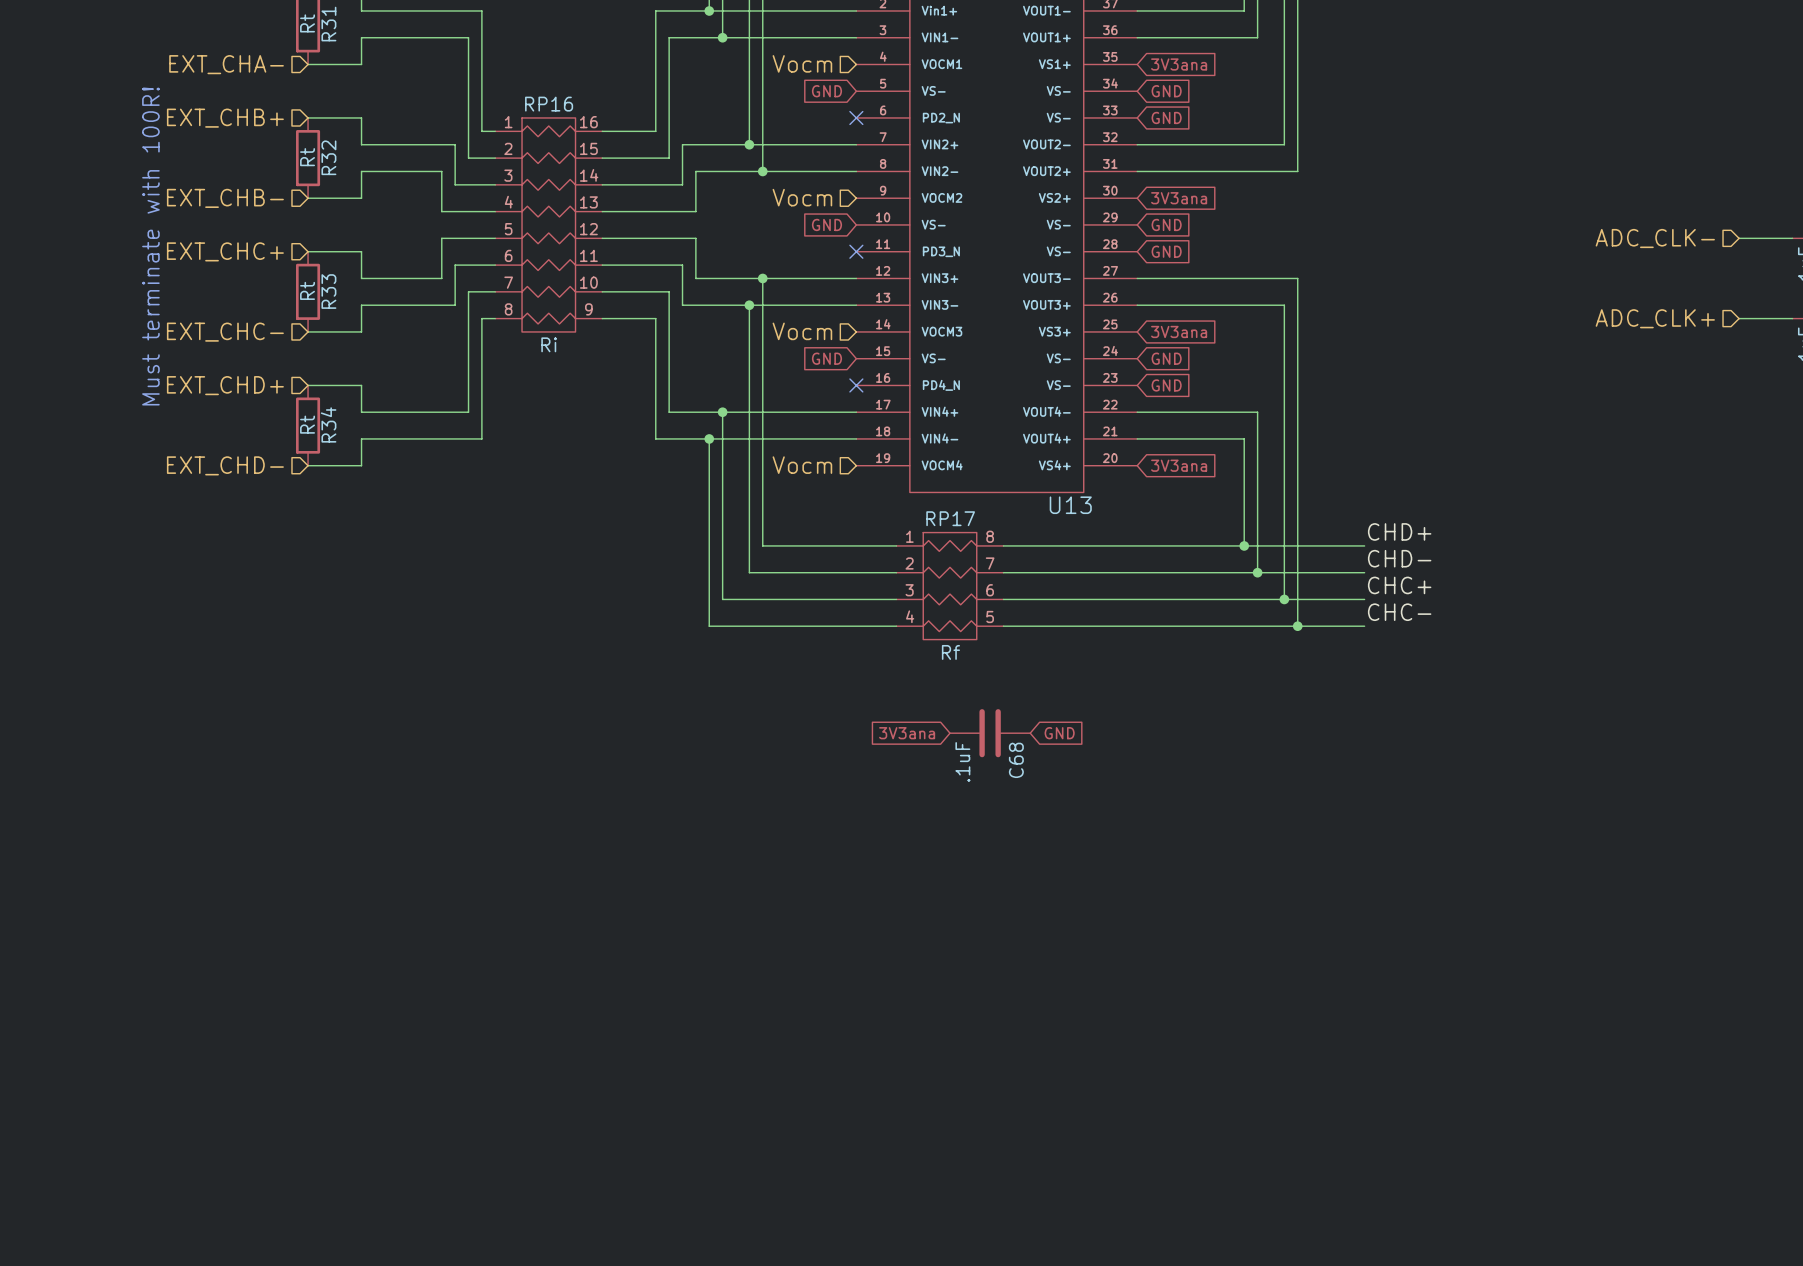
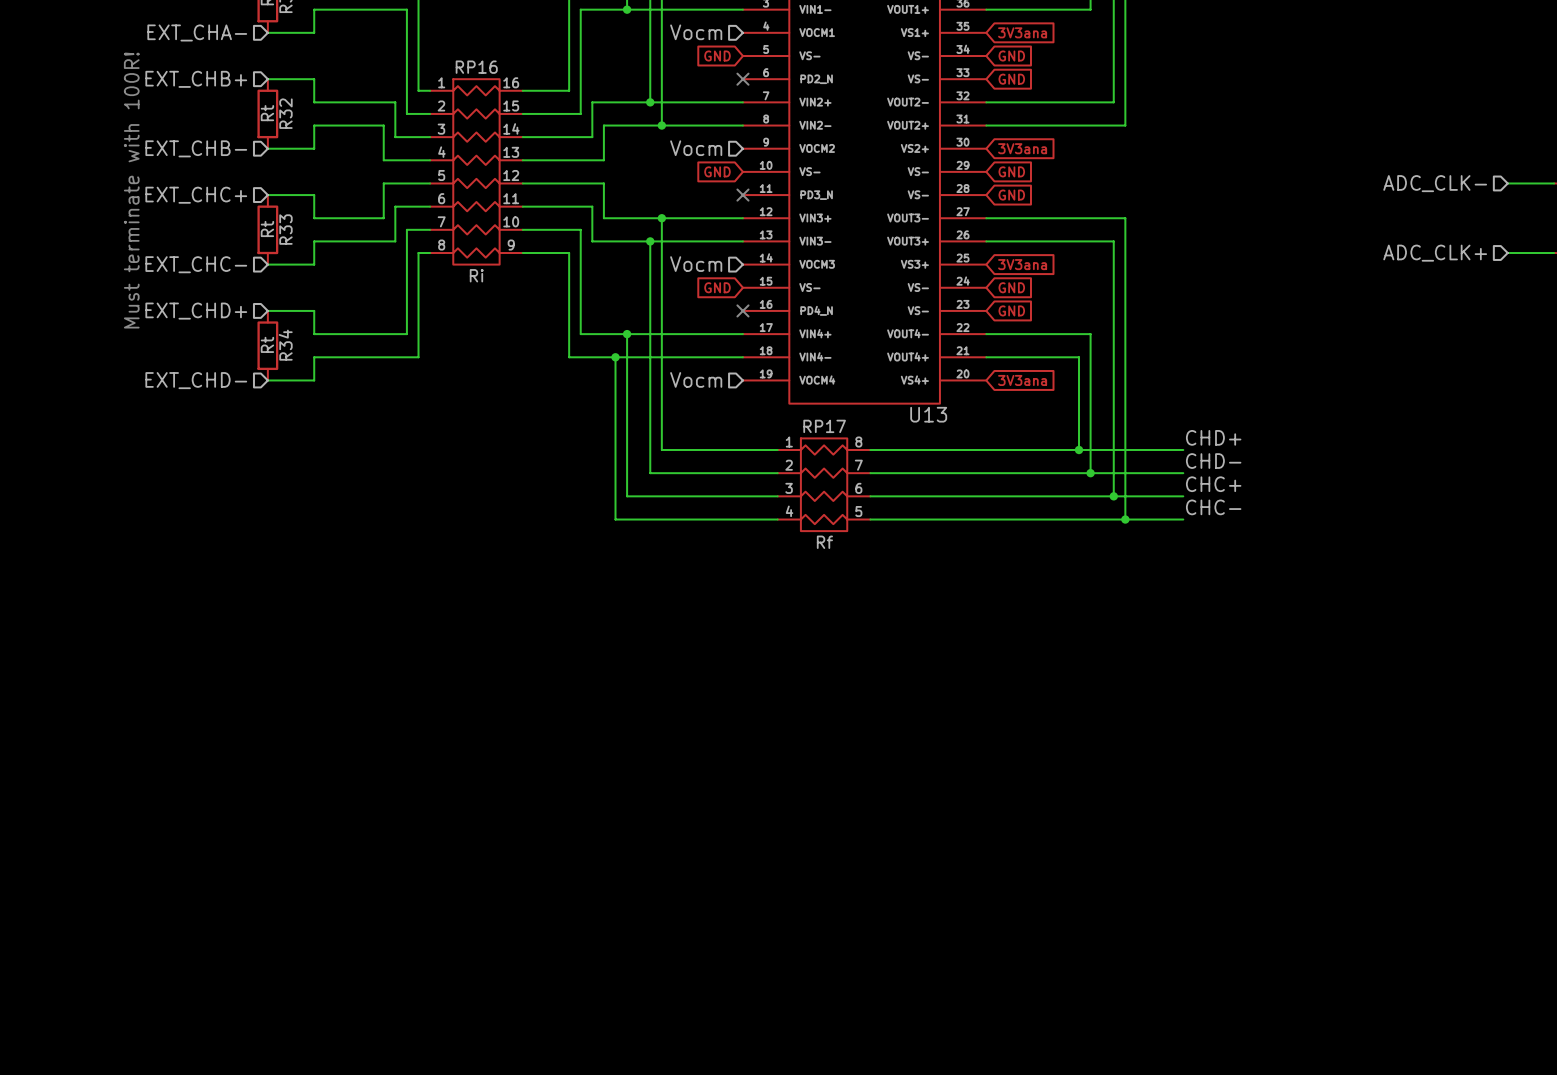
global label: 3V3ana (907, 733) -> none
C68: .1uF (990, 733) -> none
global label: GND (1059, 733) -> none

